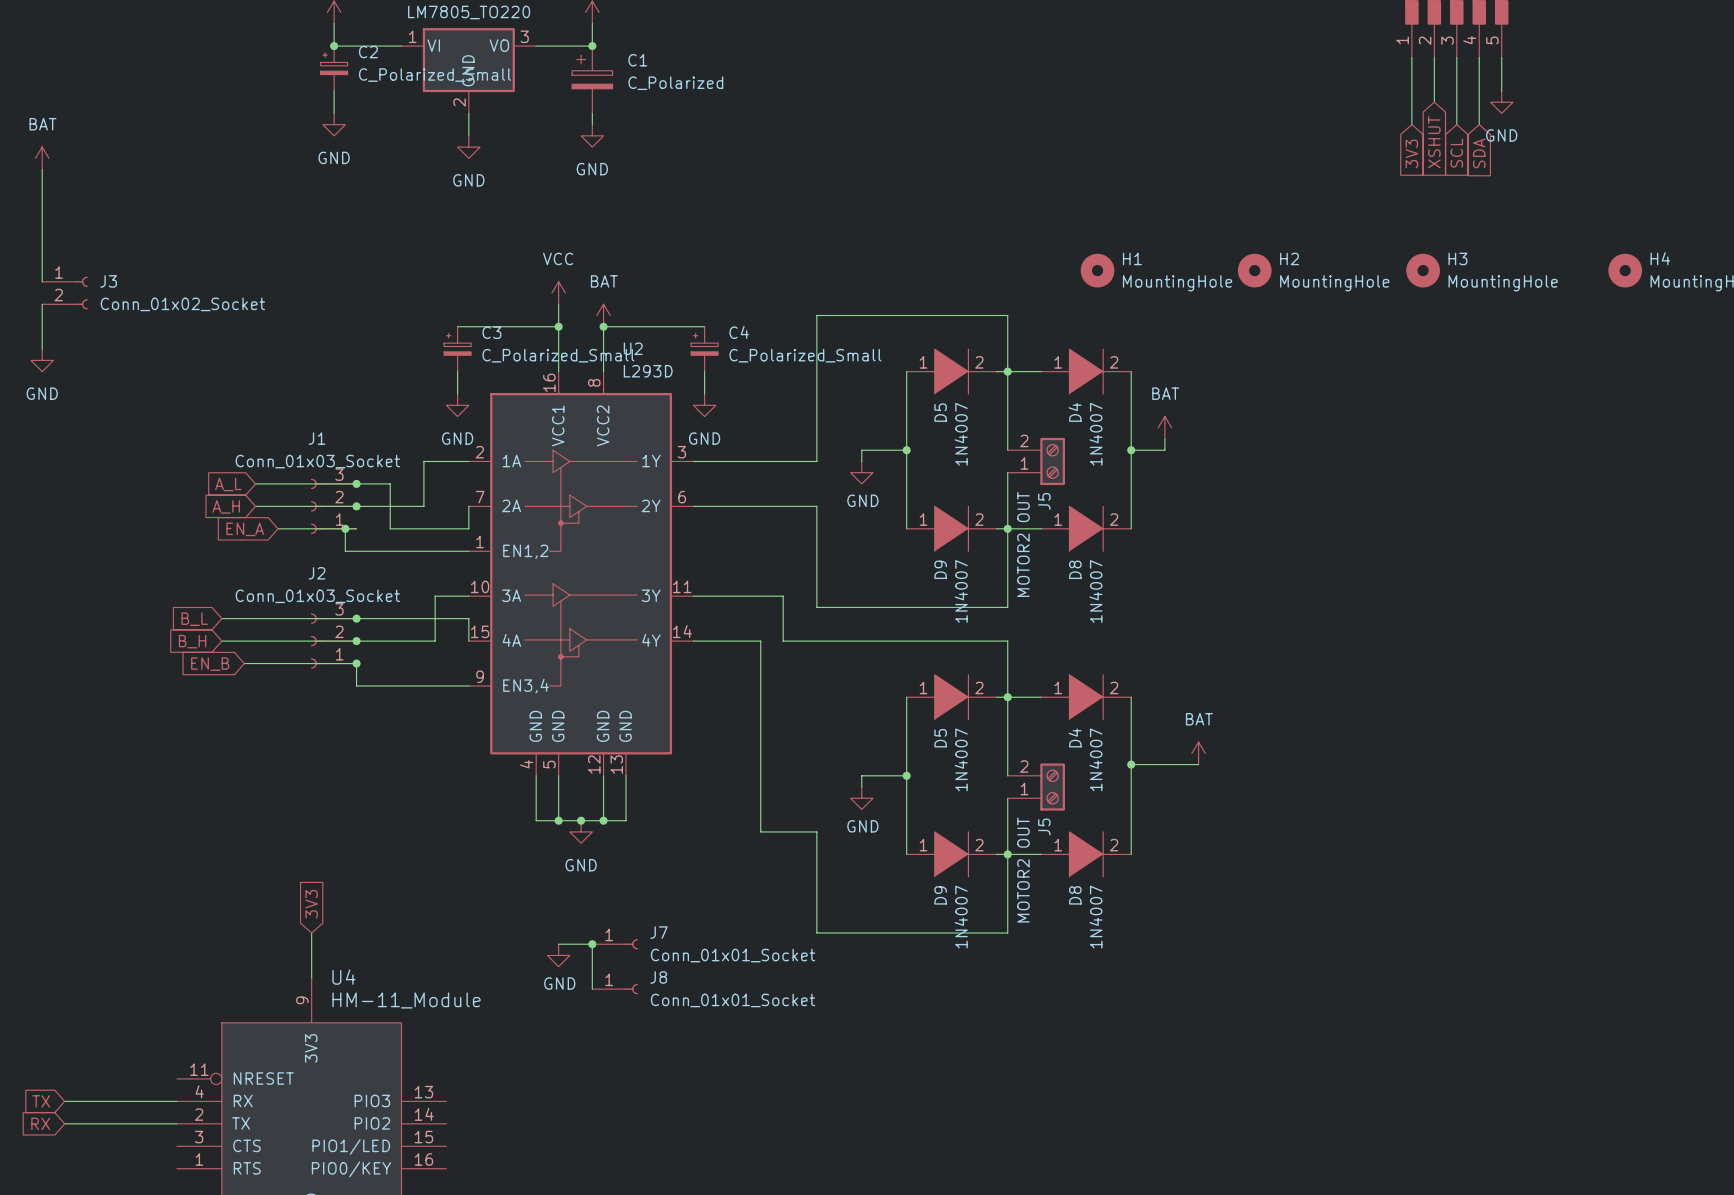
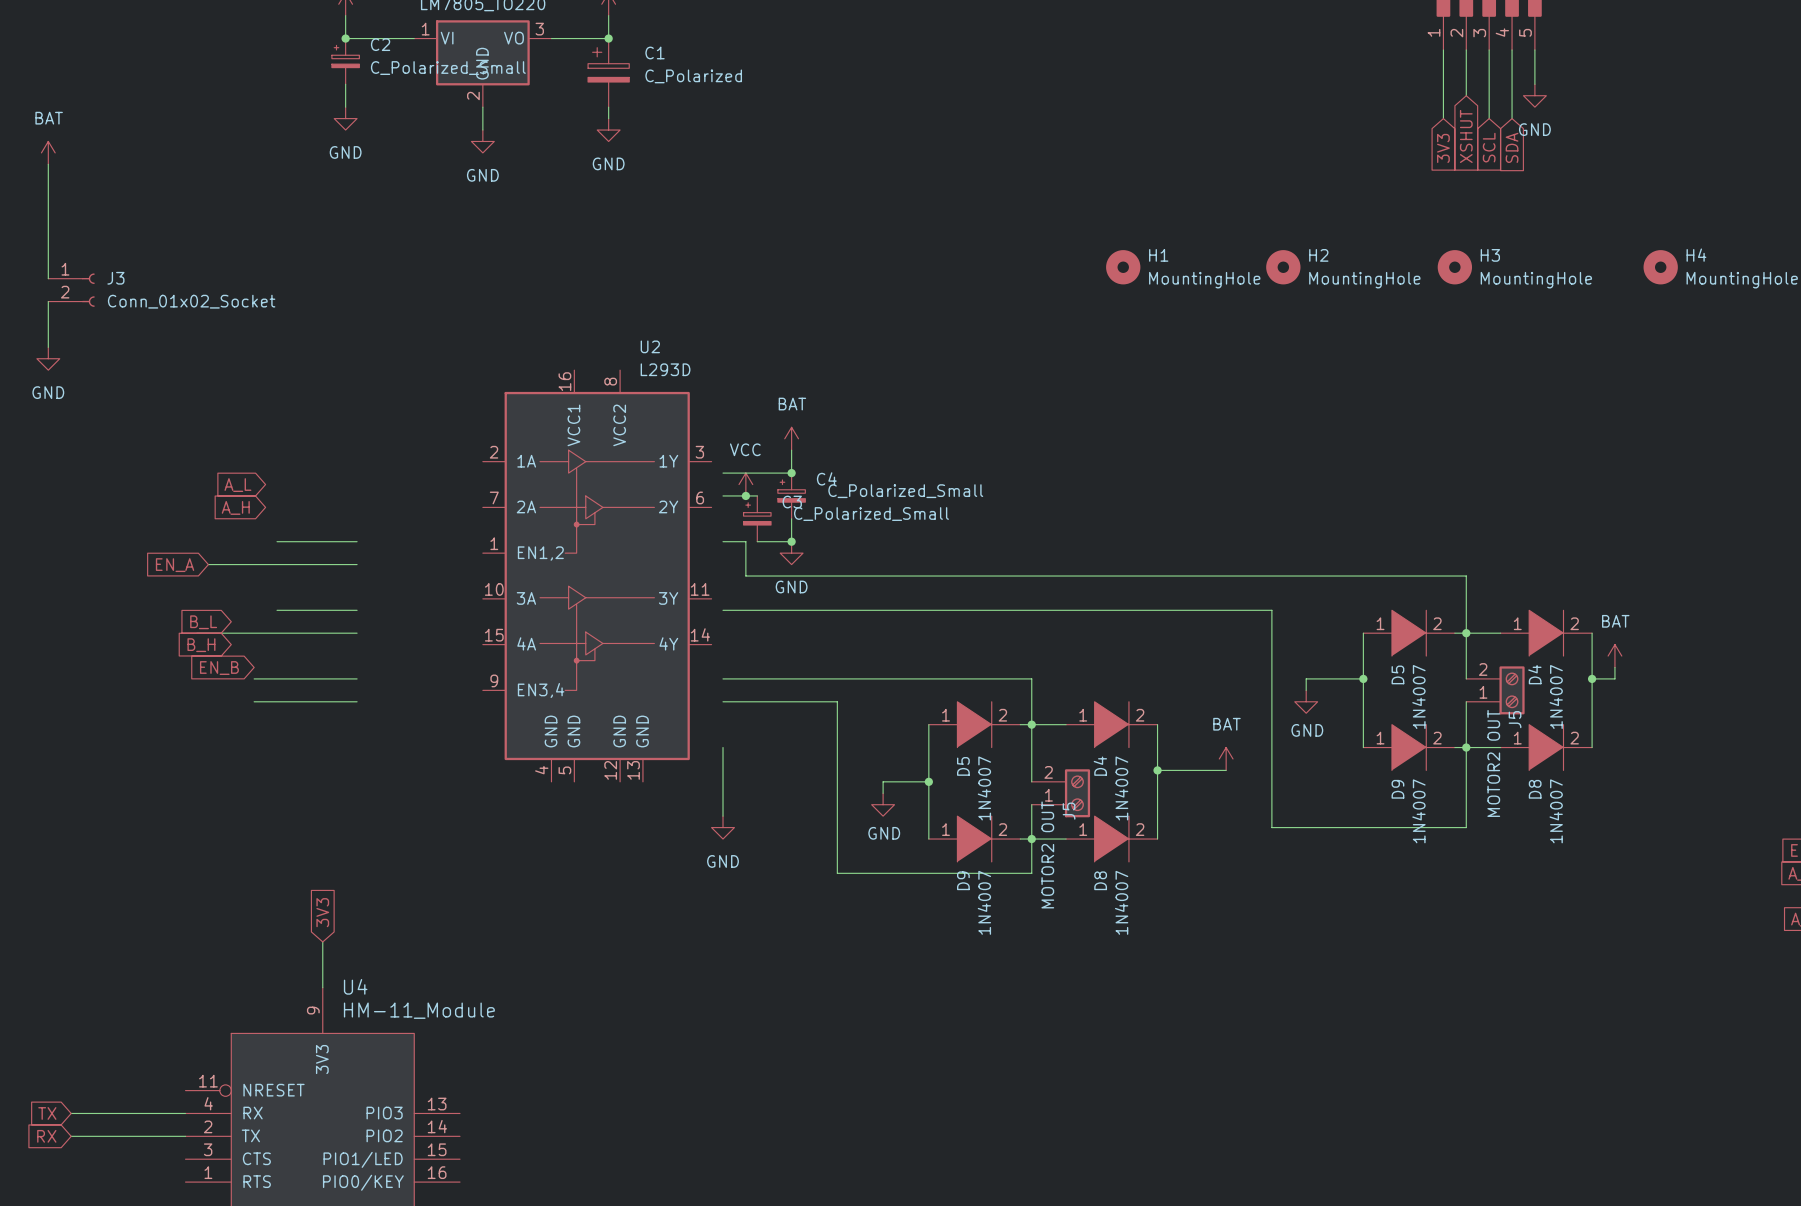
power symbol: VCC (558, 293) -> none
wire: (558, 304) (558, 371) -> none
power symbol: BAT (603, 315) -> none
wire: (457, 326) (558, 326) -> none
junction: (558, 326) -> none
junction: (603, 326) -> none
wire: (704, 326) (603, 326) (603, 371) -> none
C3 position: (457, 349) -> (757, 518)
C4 position: (704, 349) -> (791, 495)
C3 value position: C_Polarized_Small (558, 355) -> C_Polarized_Small (871, 514)
C4 value position: C_Polarized_Small (805, 355) -> C_Polarized_Small (905, 491)
wire: (457, 371) (457, 394) -> none
wire: (704, 371) (704, 394) -> none
wire: (906, 371) (906, 528) -> none
D5: 1N4007 (951, 371) -> none
wire: (996, 371) (1041, 371) -> none
junction: (1007, 371) -> none
D4: 1N4007 (1086, 371) -> none
wire: (1131, 371) (1131, 528) -> none
power symbol: GND (457, 405) -> none
power symbol: GND (704, 405) -> none
power symbol: BAT (1164, 427) -> none
power symbol: none -> BAT (791, 438)
wire: (1164, 439) (1164, 450) (1131, 450) -> none
wire: none -> (791, 450) (791, 473) (723, 473)
wire: (906, 450) (861, 450) (861, 461) -> none
junction: (906, 450) -> none
wire: (1007, 450) (1007, 315) (816, 315) (816, 461) (693, 461) -> none
junction: (1131, 450) -> none
wire: (468, 461) (423, 461) (423, 506) (255, 506) -> none
J5: MOTOR2 OUT (1036, 461) -> none
junction: none -> (791, 473)
power symbol: GND (861, 472) -> none
wire: (1007, 472) (1007, 607) -> (1466, 701) (1466, 827) (1271, 827) (1271, 610) (1031, 610)
wire: (255, 483) (390, 483) (390, 528) (468, 528) (468, 506) -> none
junction: (356, 483) -> none
power symbol: none -> VCC (745, 484)
wire: none -> (723, 495) (757, 495)
junction: none -> (745, 495)
J1: Conn_01x03_Socket (333, 506) -> none
junction: (356, 506) -> none
wire: (693, 506) (816, 506) (816, 607) -> (723, 610) (837, 610)
wire: none -> (791, 518) (791, 541) (757, 541)
wire: (277, 528) (356, 528) -> (277, 541) (357, 541)
wire: (345, 528) (345, 551) (468, 551) -> none
junction: (345, 528) -> none
D9: 1N4007 (951, 528) -> none
wire: (996, 528) (1041, 528) -> none
junction: (1007, 528) -> none
D8: 1N4007 (1086, 528) -> none
global label position: EN_A (245, 529) -> EN_A (175, 565)
wire: none -> (723, 541) (745, 541) (745, 576) (1466, 576) (1466, 678)
junction: none -> (791, 541)
power symbol: none -> GND (791, 553)
wire: none -> (208, 564) (357, 564)
wire: (468, 596) (435, 596) (435, 641) (221, 641) -> none
wire: (693, 596) (783, 596) (783, 641) (1007, 641) (1007, 674) -> (723, 678) (1031, 678)
wire: none -> (277, 610) (357, 610)
wire: (221, 618) (468, 618) (468, 641) -> none
junction: (356, 618) -> none
wire: none -> (196, 633) (357, 633)
wire: none -> (1363, 633) (1363, 747)
D5: none -> 1N4007 (1409, 633)
wire: none -> (1454, 633) (1500, 633)
junction: none -> (1466, 633)
D4: none -> 1N4007 (1546, 633)
wire: none -> (1592, 633) (1592, 747)
J2: Conn_01x03_Socket (333, 641) -> none
junction: (356, 641) -> none
wire: (693, 641) (760, 641) (760, 831) (816, 831) -> (723, 701) (837, 701) (837, 839)
power symbol: none -> BAT (1614, 656)
wire: (244, 663) (356, 663) (356, 686) (468, 686) -> none
junction: (356, 663) -> none
wire: none -> (1614, 667) (1614, 678) (1592, 678)
wire: none -> (254, 678) (357, 678)
wire: none -> (1363, 678) (1306, 678) (1306, 690)
junction: none -> (1363, 678)
junction: none -> (1592, 678)
J5: none -> MOTOR2 OUT (1495, 690)
wire: none -> (254, 701) (357, 701)
wire: (906, 697) (906, 719) -> none
D5 position: (951, 697) -> (974, 724)
wire: (996, 697) (1041, 697) -> (1020, 724) (1066, 724)
junction position: (1007, 697) -> (1031, 724)
D4 position: (1086, 697) -> (1111, 724)
wire: (1131, 697) (1131, 719) -> none
power symbol: none -> GND (1306, 701)
wire: none -> (723, 747) (723, 816)
D9: none -> 1N4007 (1409, 747)
wire: none -> (1454, 747) (1500, 747)
junction: none -> (1466, 747)
D8: none -> 1N4007 (1546, 747)
wire: (536, 775) (536, 820) (626, 820) (626, 775) -> none
wire: (558, 775) (558, 820) -> none
wire: (603, 775) (603, 820) -> none
junction: (558, 820) -> none
junction: (581, 820) -> none
junction: (603, 820) -> none
power symbol: none -> GND (723, 827)
J5 name position: J5 (1044, 827) -> J5 (1069, 811)
power symbol: GND (581, 831) -> none
wire: (906, 831) (906, 854) -> none
wire: (1131, 831) (1131, 854) -> none
D9 position: (951, 854) -> (974, 839)
wire: (996, 854) (1041, 854) -> (1020, 839) (1066, 839)
junction position: (1007, 854) -> (1031, 839)
D8 position: (1086, 854) -> (1111, 839)
wire: (816, 865) (816, 932) (1007, 932) (1007, 865) -> (837, 873) (1031, 873)
J5 value position: MOTOR2 OUT (1023, 870) -> MOTOR2 OUT (1047, 854)
wire: (558, 944) (592, 944) (592, 989) -> none
junction: (592, 944) -> none
J7: Conn_01x01_Socket (615, 944) -> none
power symbol: GND (558, 955) -> none
J8: Conn_01x01_Socket (615, 989) -> none

